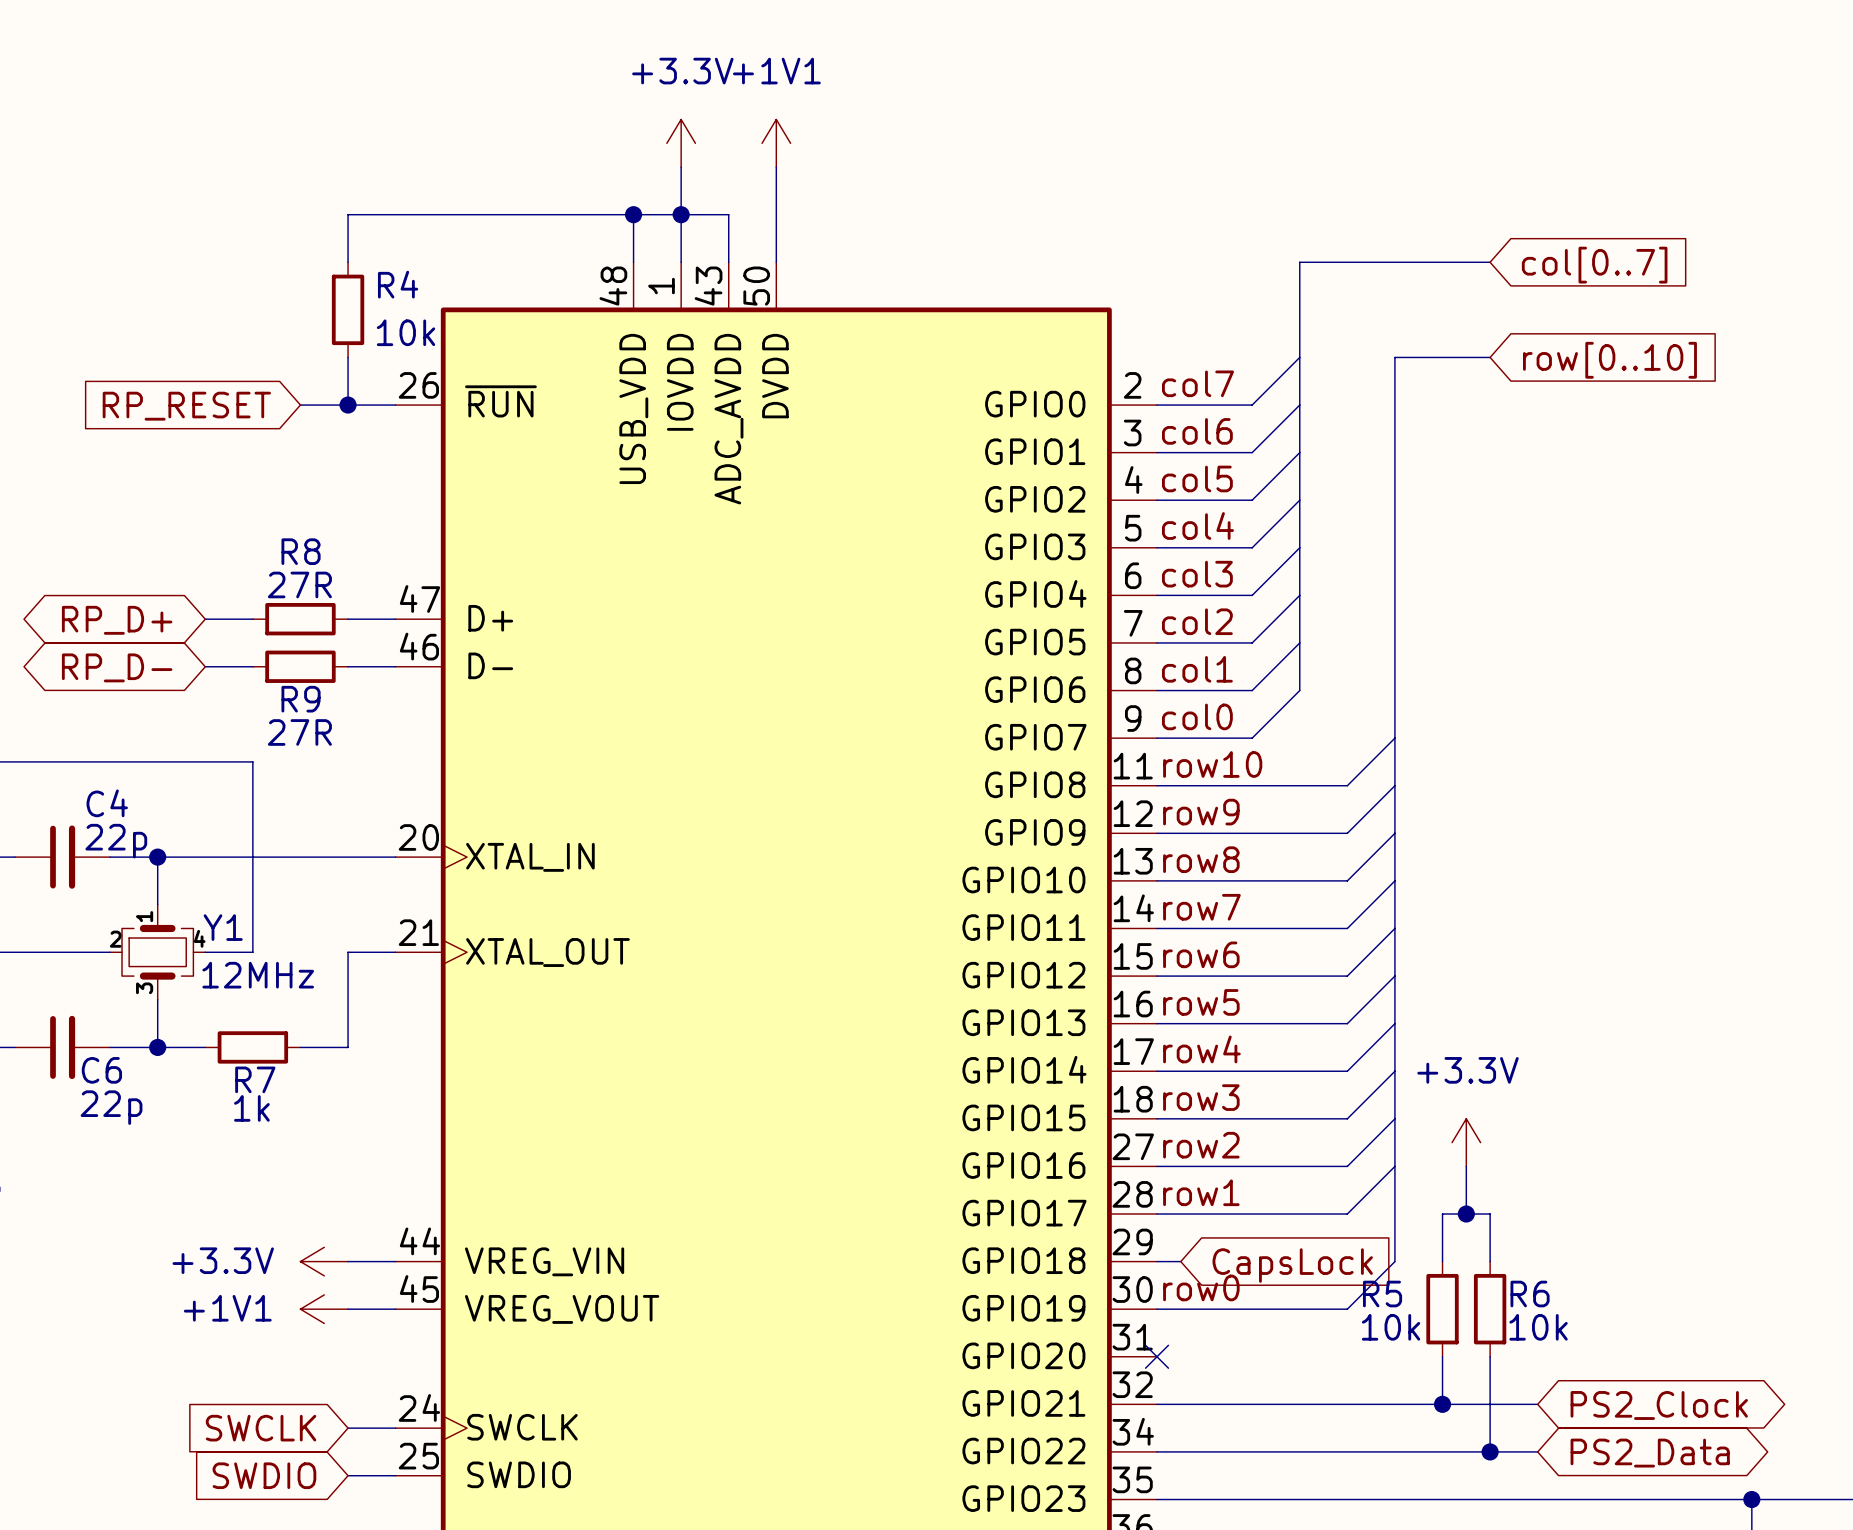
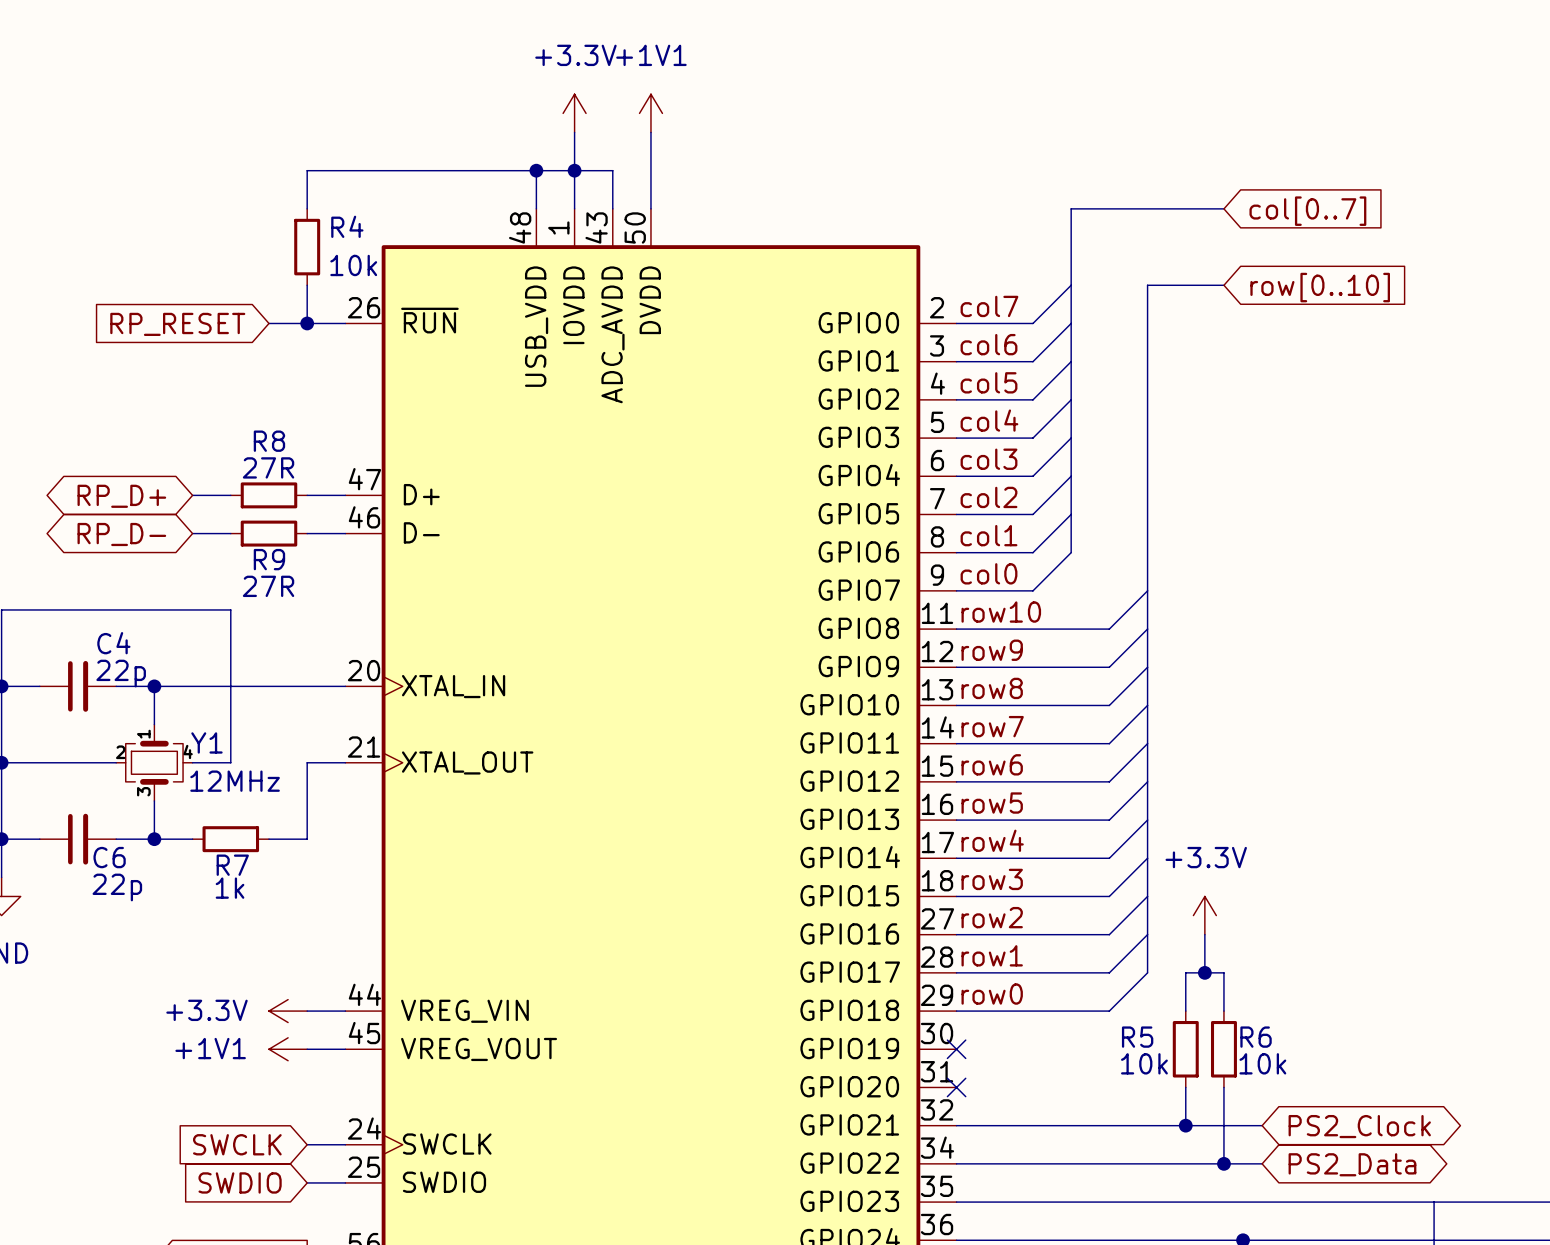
wire: none -> (1147, 972) (1109, 1011) (975, 1011)
bus: (1394, 1214) (1394, 1261) -> none
wire: (1394, 1261) (1347, 1309) (1157, 1309) -> none
global label: CapsLock (1292, 1265) -> none
label position: row0 (1201, 1287) -> row0 (992, 994)
no-connect mark: none -> (956, 1049)
junction: (1751, 1499) -> none

